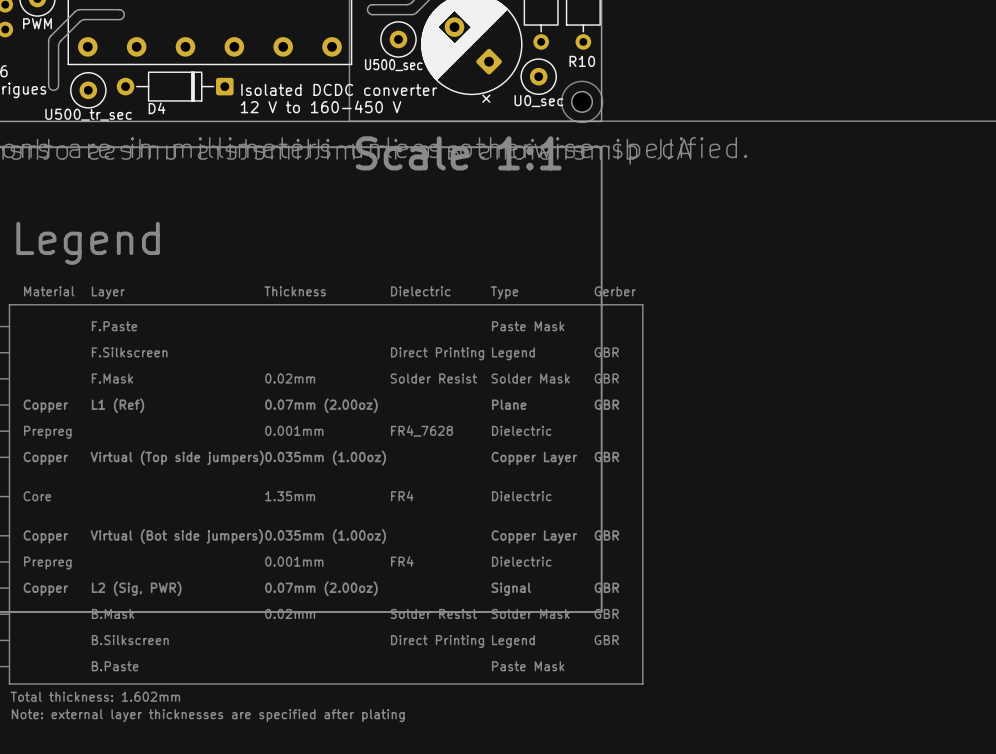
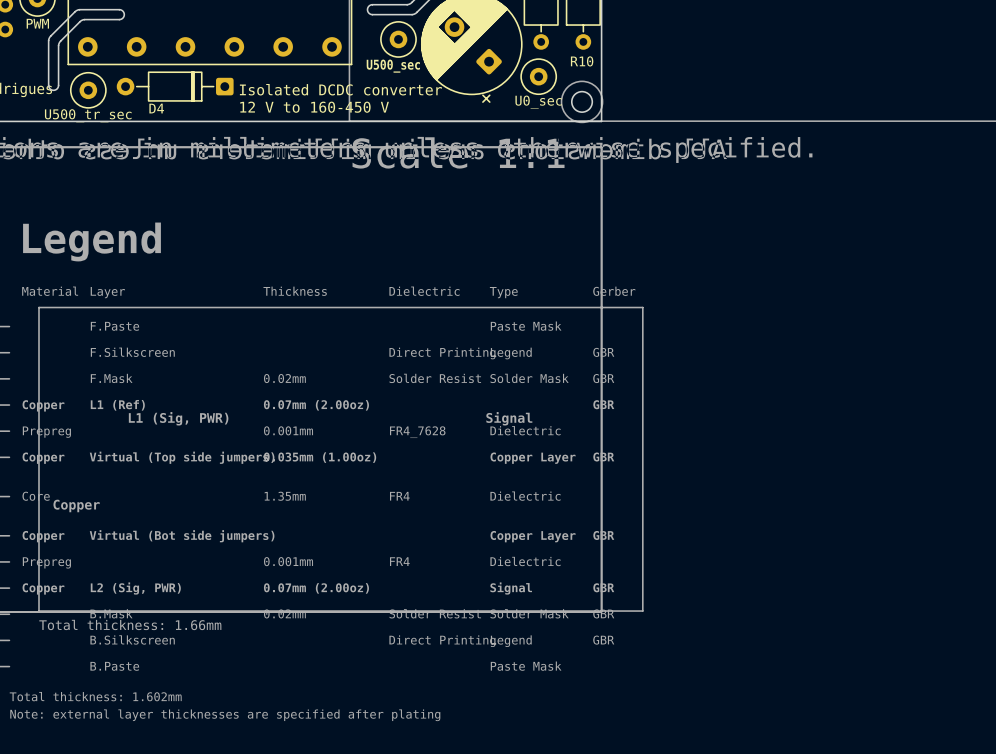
line: (642, 307) (642, 304) (9, 304) (9, 684) (642, 684) (642, 611) -> (642, 307) (39, 307) (39, 611) (642, 611)
text: Plane (509, 404) -> none
text: none -> L1 (Sig, PWR) (178, 418)
text: none -> Signal (509, 418)
text: none -> Copper (76, 505)
text: 0.035mm (1.00oz) (325, 536) -> none
text: none -> Total thickness: 1.66mm (130, 624)

